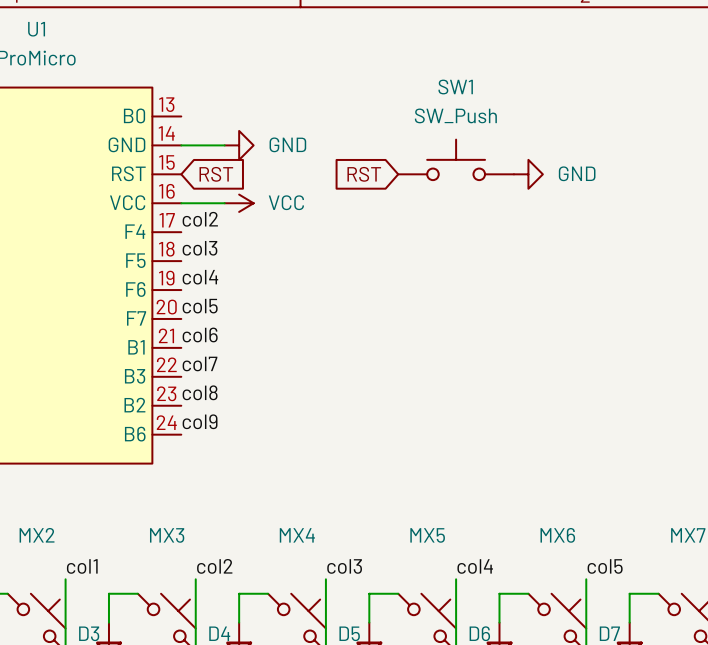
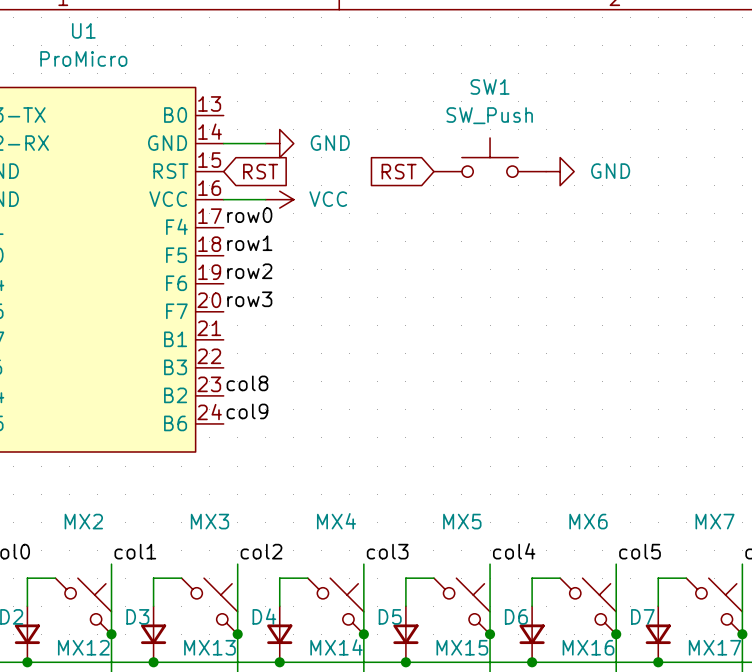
label: col2 (200, 219) -> row0 (249, 215)
label: col3 (199, 248) -> row1 (249, 243)
label: col4 (200, 277) -> row2 (249, 271)
label: col5 (200, 306) -> row3 (249, 299)
label: col6 (200, 334) -> none
label: col7 (199, 363) -> none

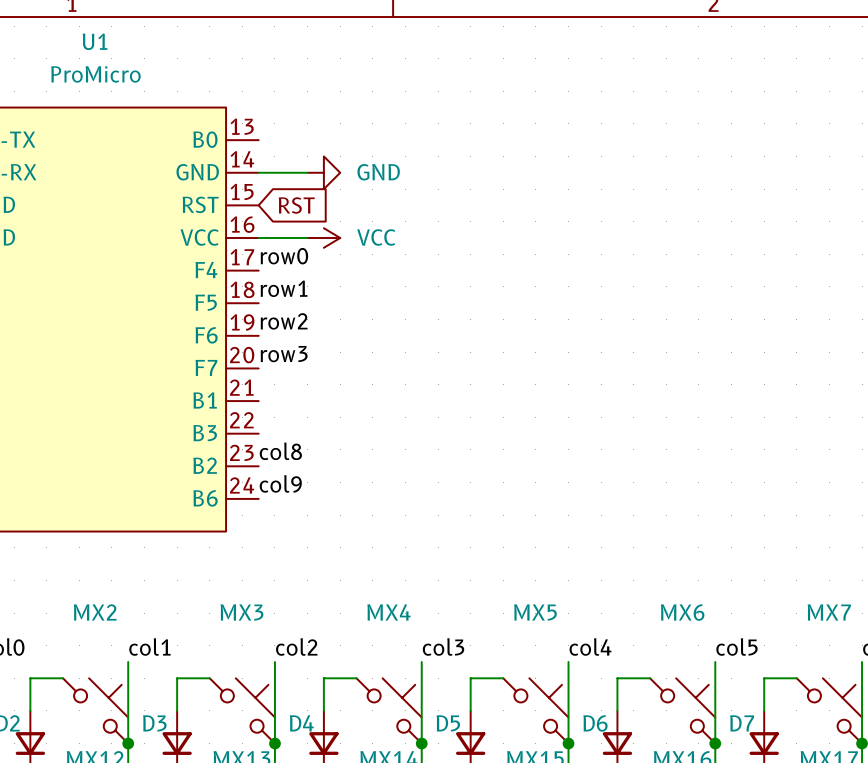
SW1: SW_Push (490, 157) -> none
global label: RST (399, 171) -> none
power symbol: GND (560, 171) -> none

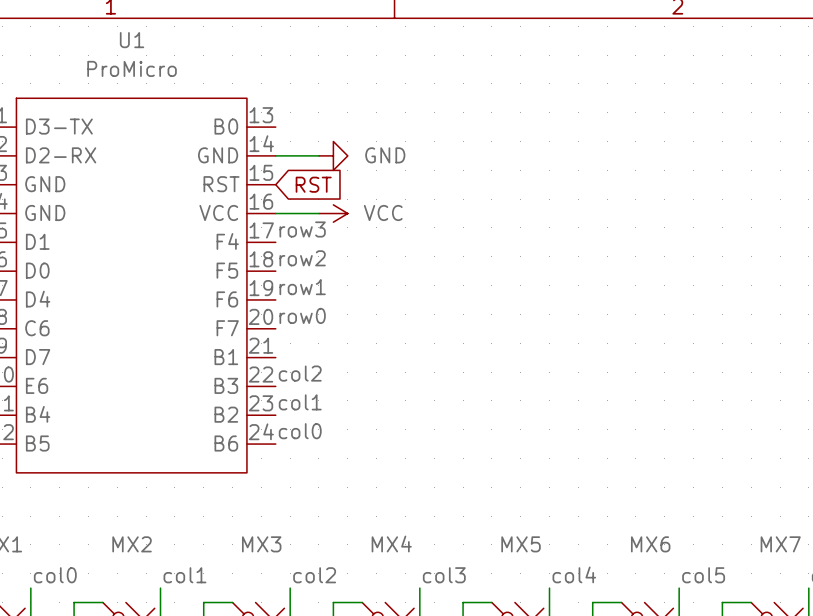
label: row0 (284, 256) -> row3 (302, 229)
label: row1 (284, 288) -> row2 (302, 258)
label: row2 (284, 321) -> row1 (302, 287)
label: row3 (284, 354) -> row0 (302, 315)
label: none -> col2 (300, 373)
label: col8 (280, 451) -> col1 (300, 402)
label: col9 (280, 483) -> col0 (300, 431)

